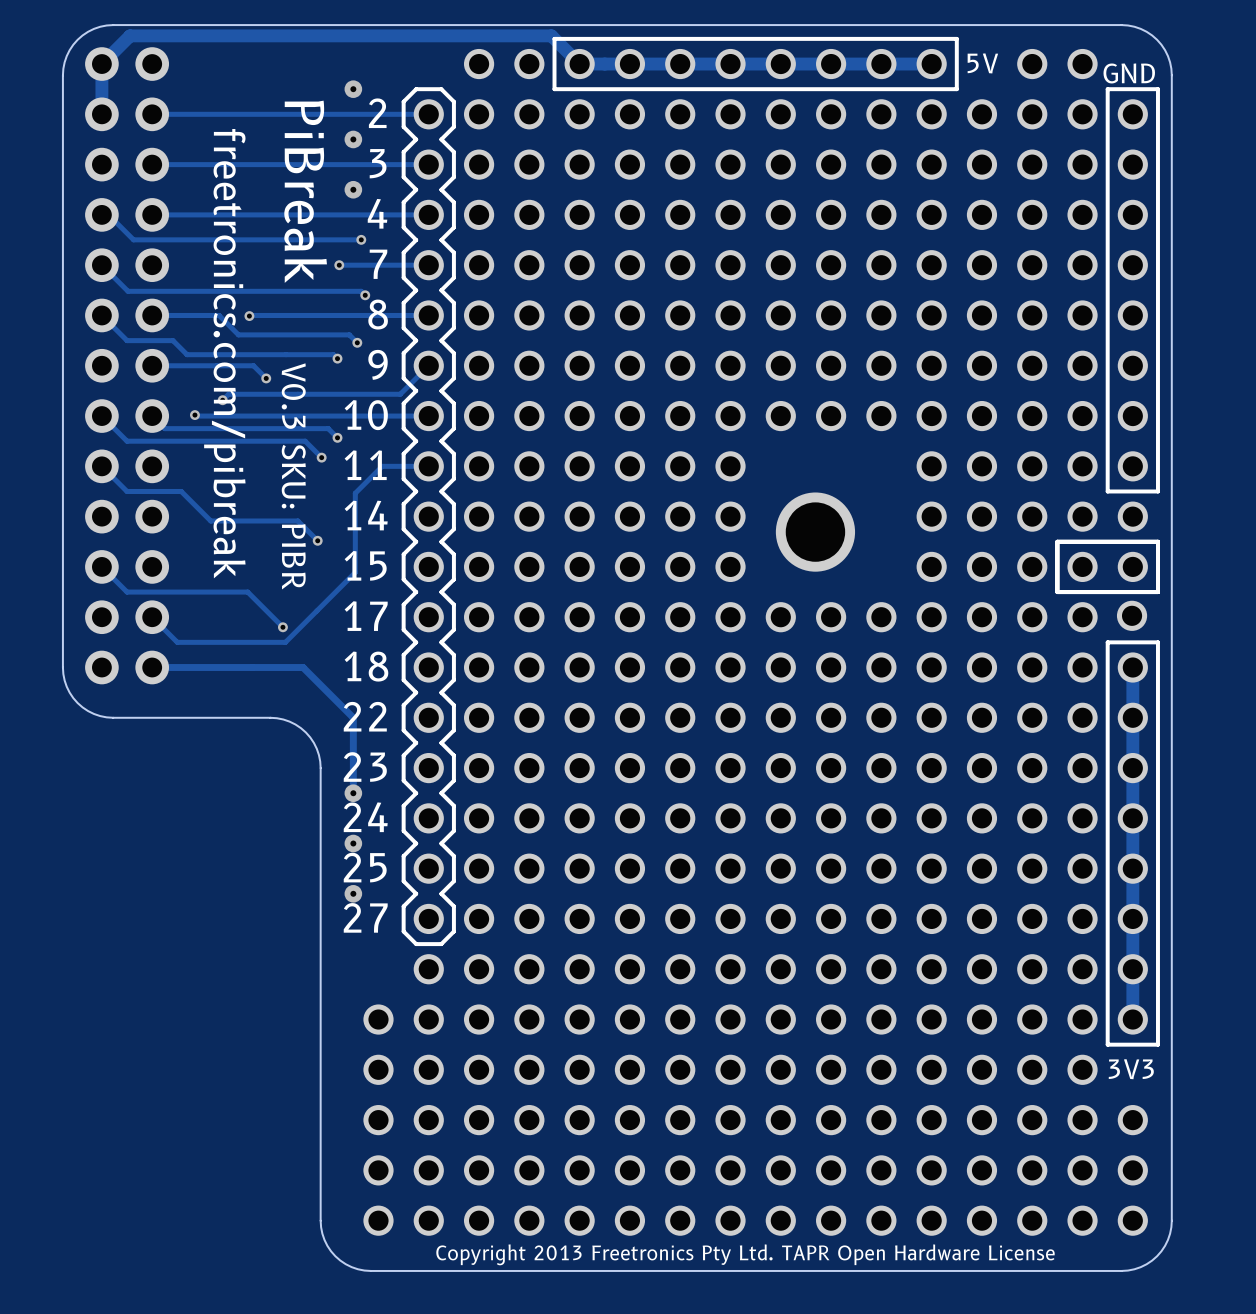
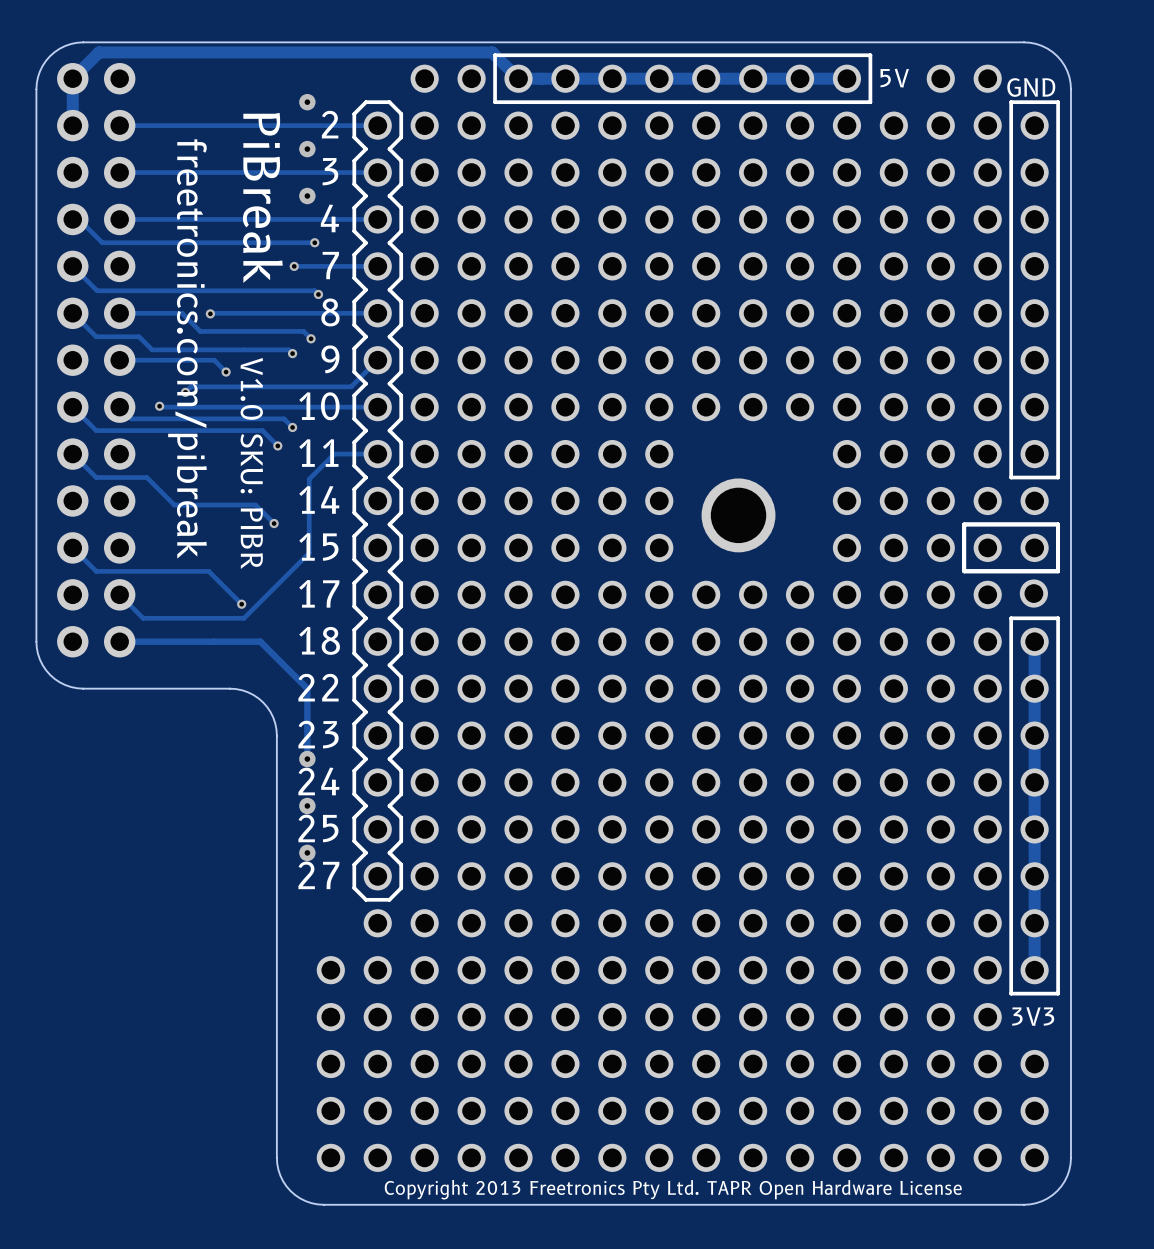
text: V0.3 SKU: PIBR (293, 476) -> V1.0 SKU: PIBR (251, 463)

